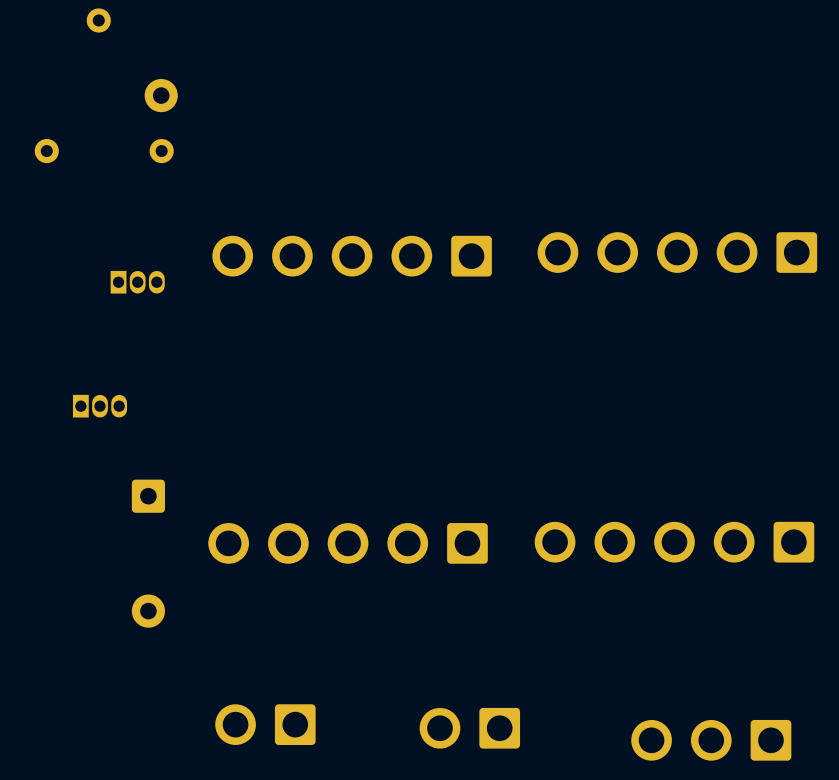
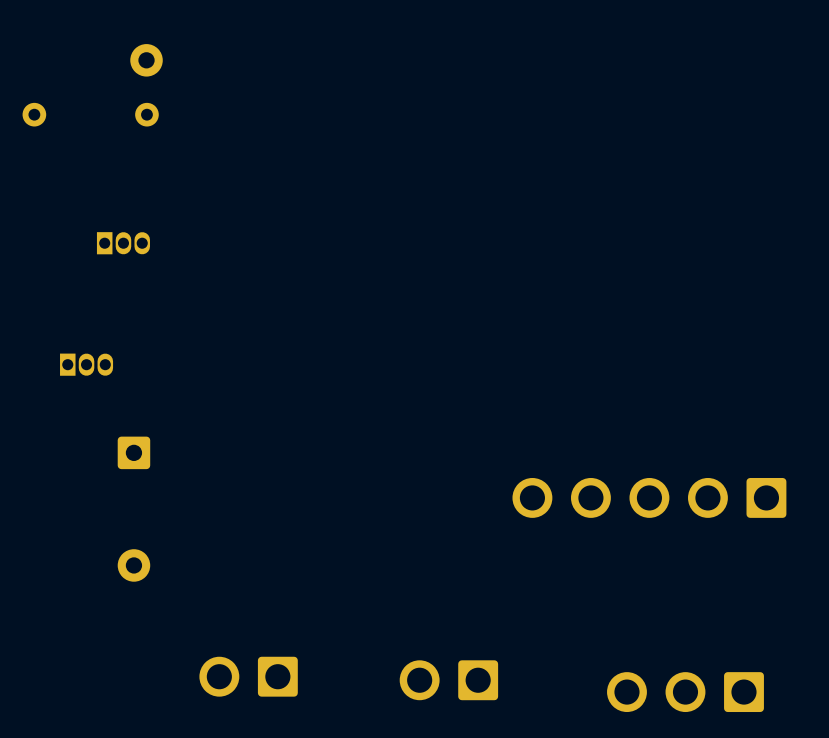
part: (677, 252) -> none
part: (352, 256) -> none
part: (348, 543) -> none

